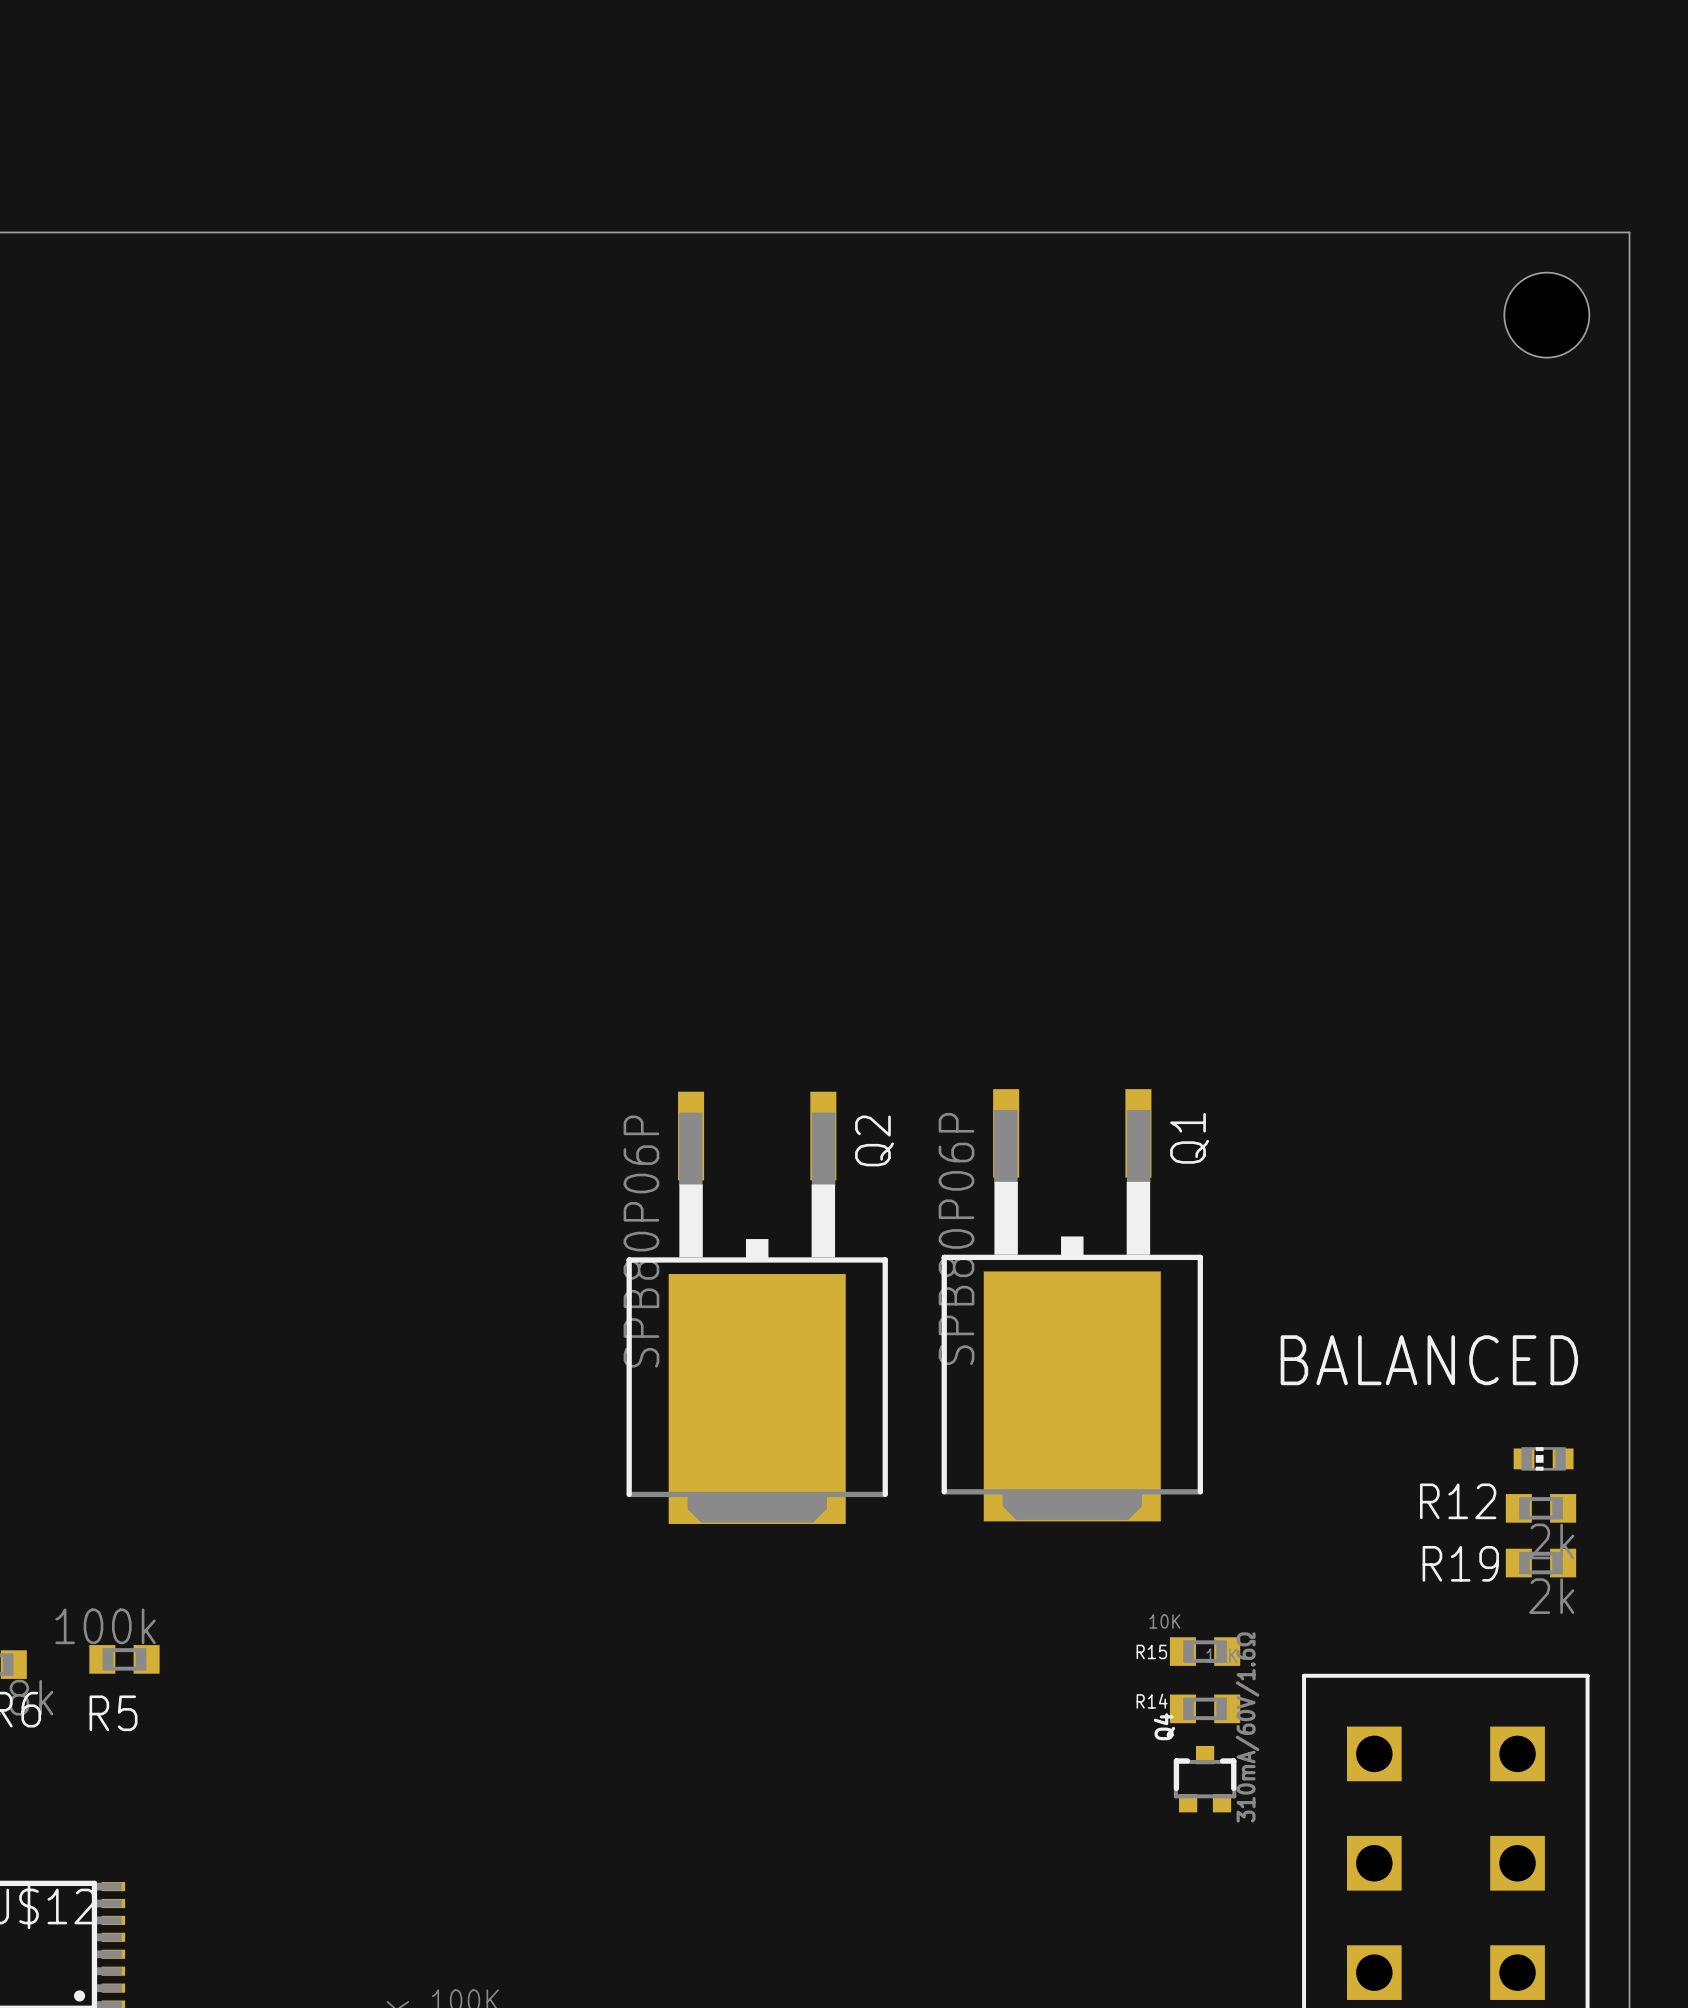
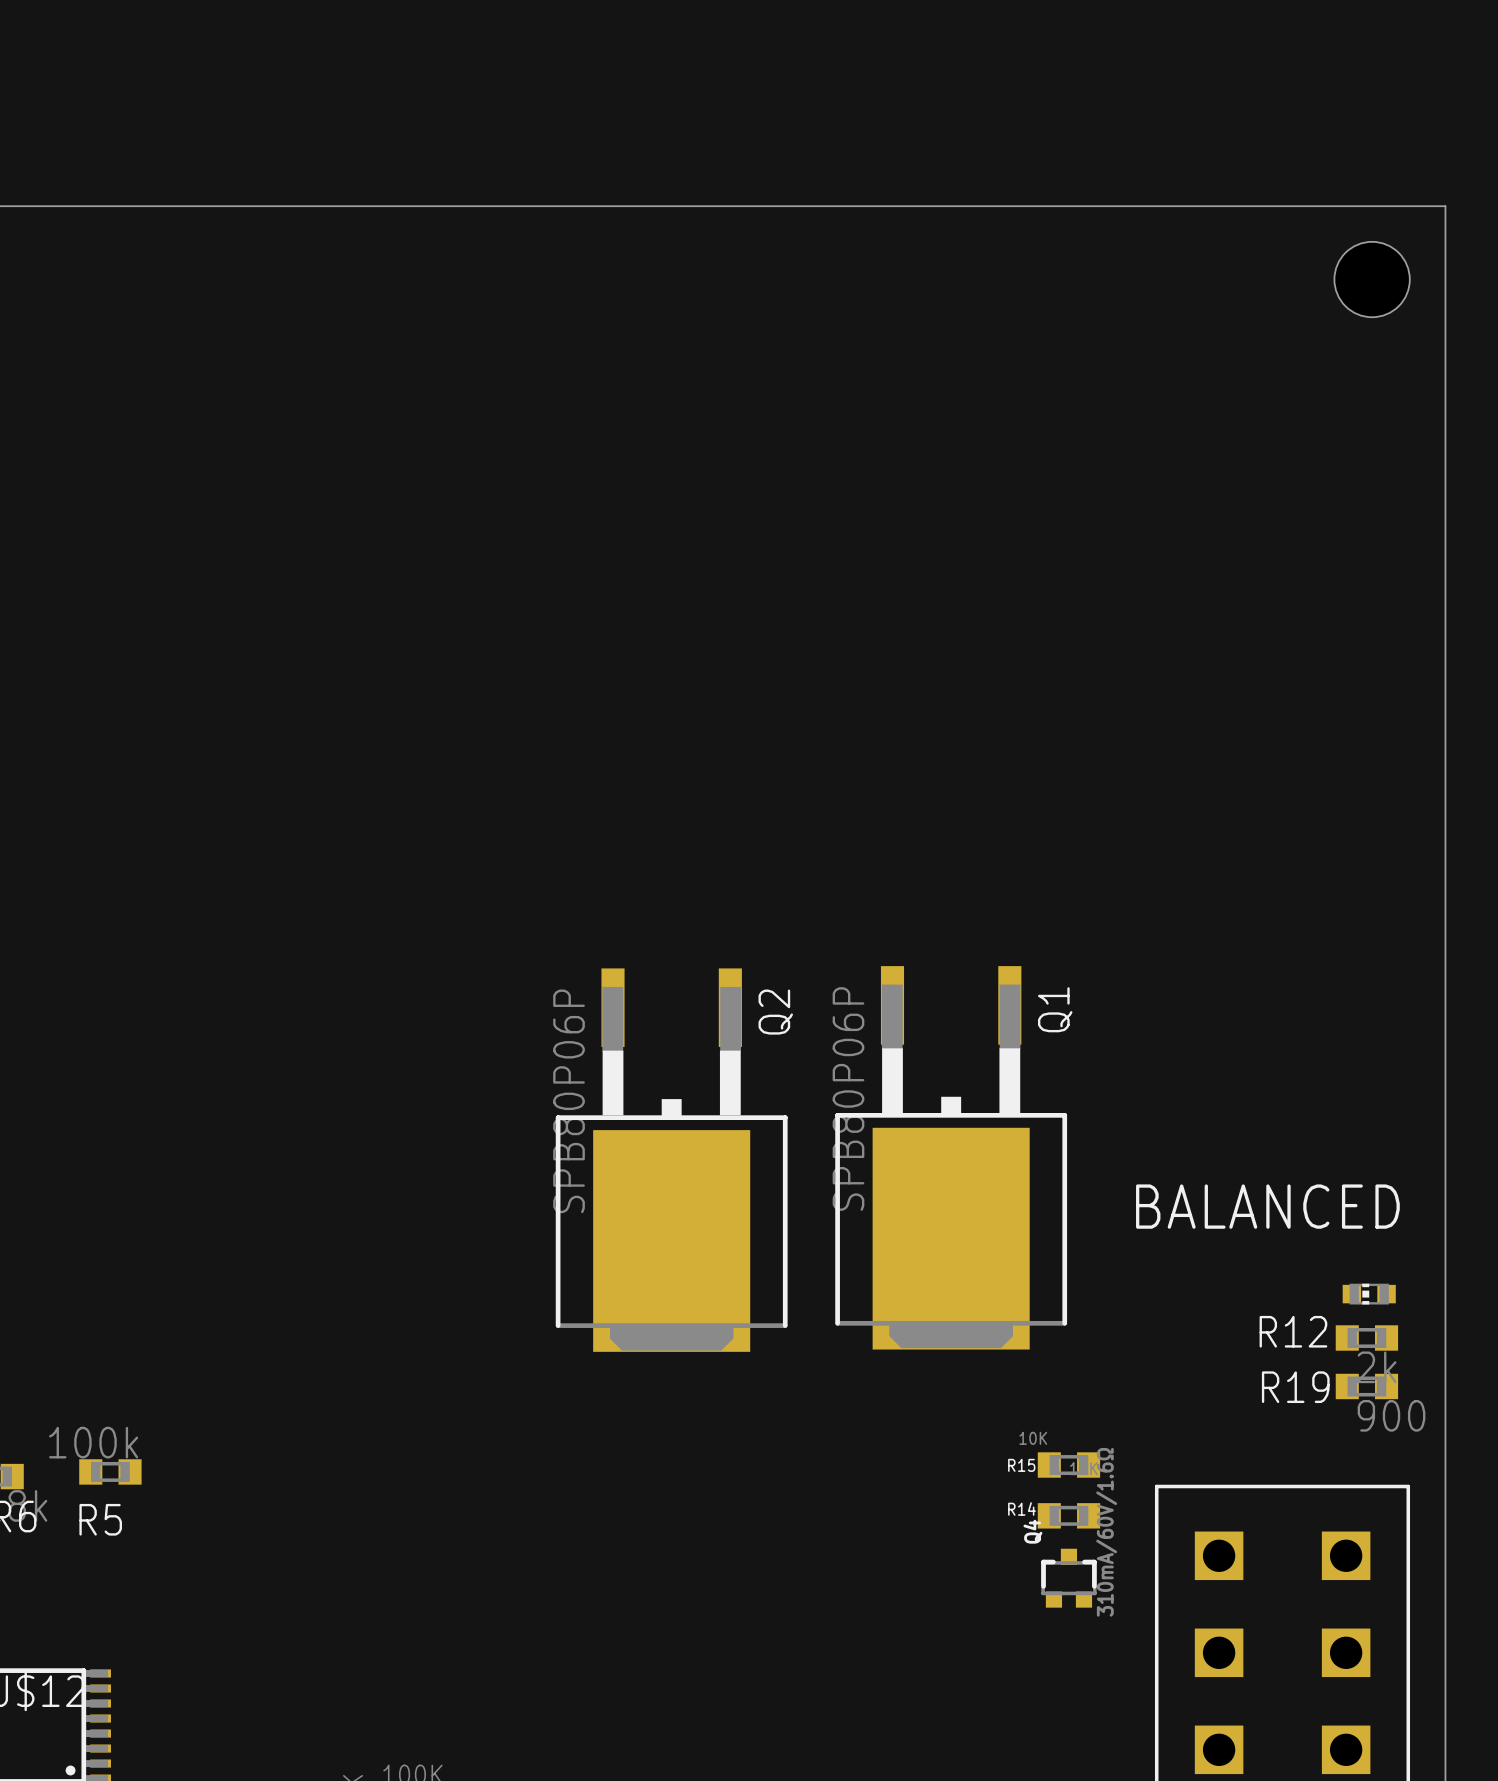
R19 value: 2k (1551, 1596) -> 900 (1391, 1415)

